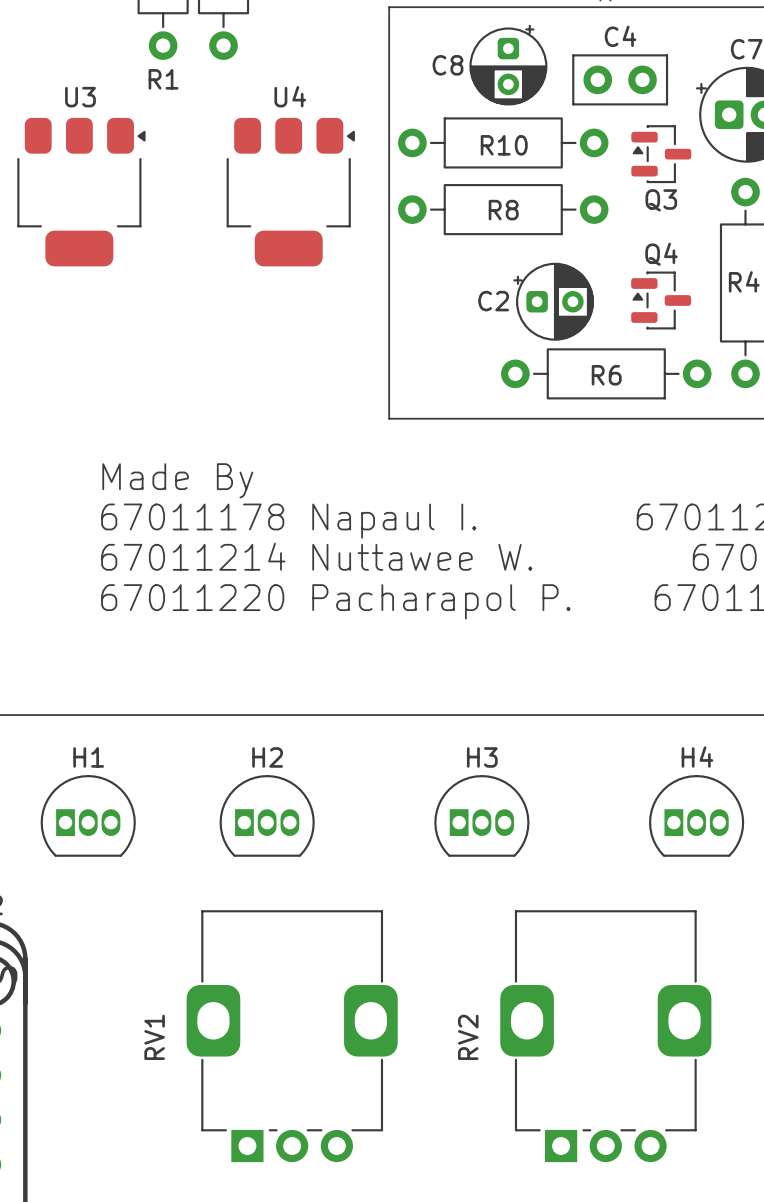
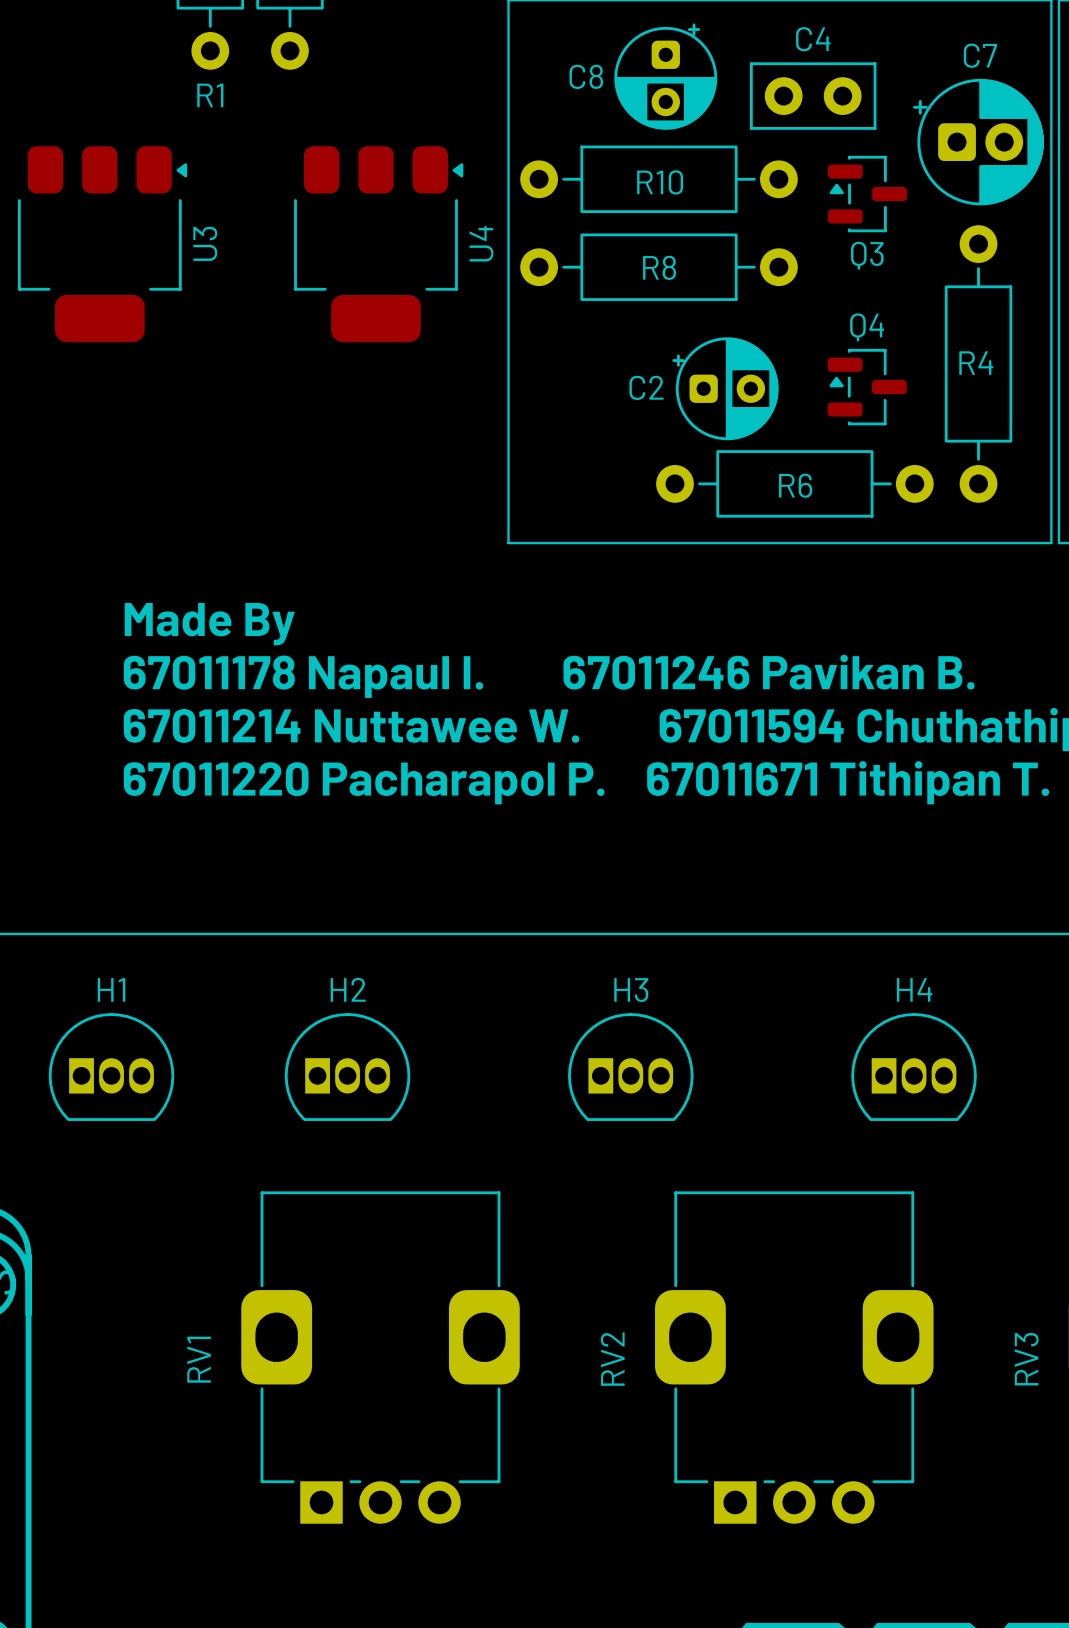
U4 name rotation: 0° (290, 96) -> 90° counterclockwise (481, 243)
U4 name position: U4 (290, 96) -> U4 (481, 243)
U3 name rotation: 0° (80, 97) -> 90° counterclockwise (205, 243)
U3 name position: U3 (80, 97) -> U3 (205, 243)

